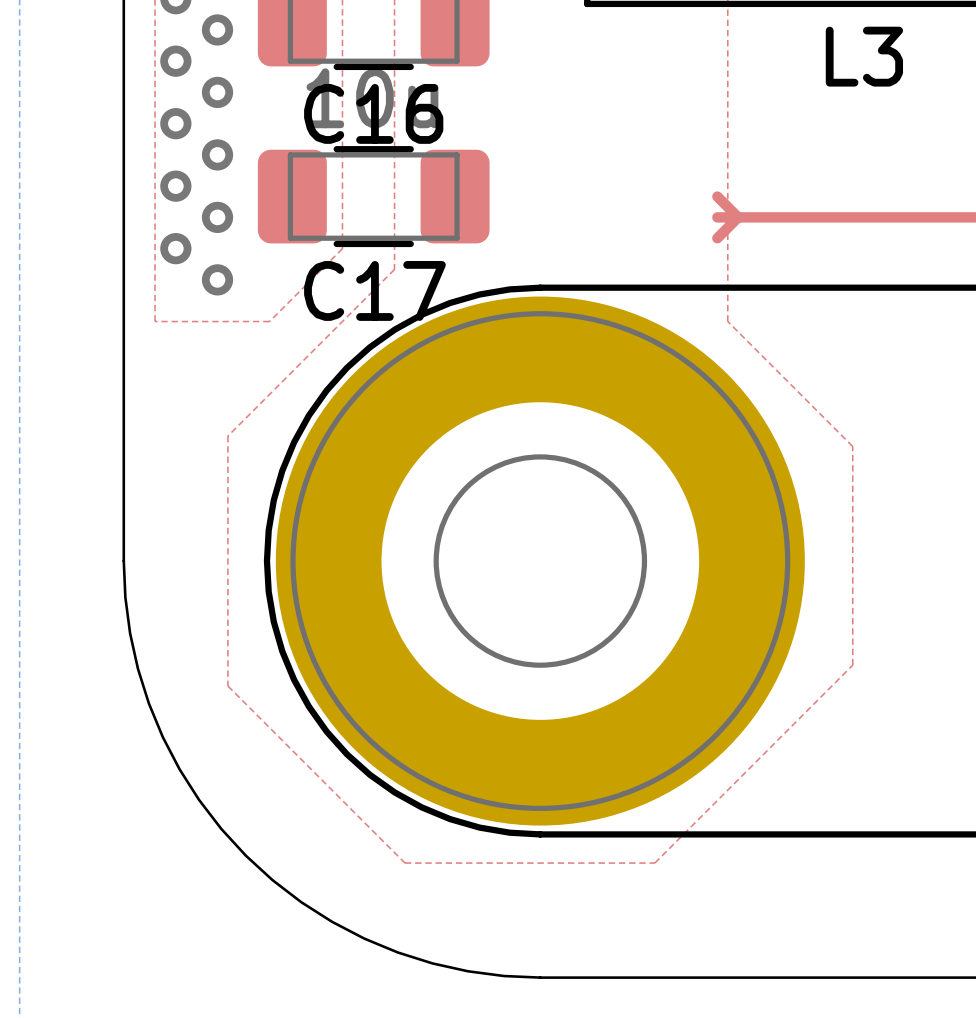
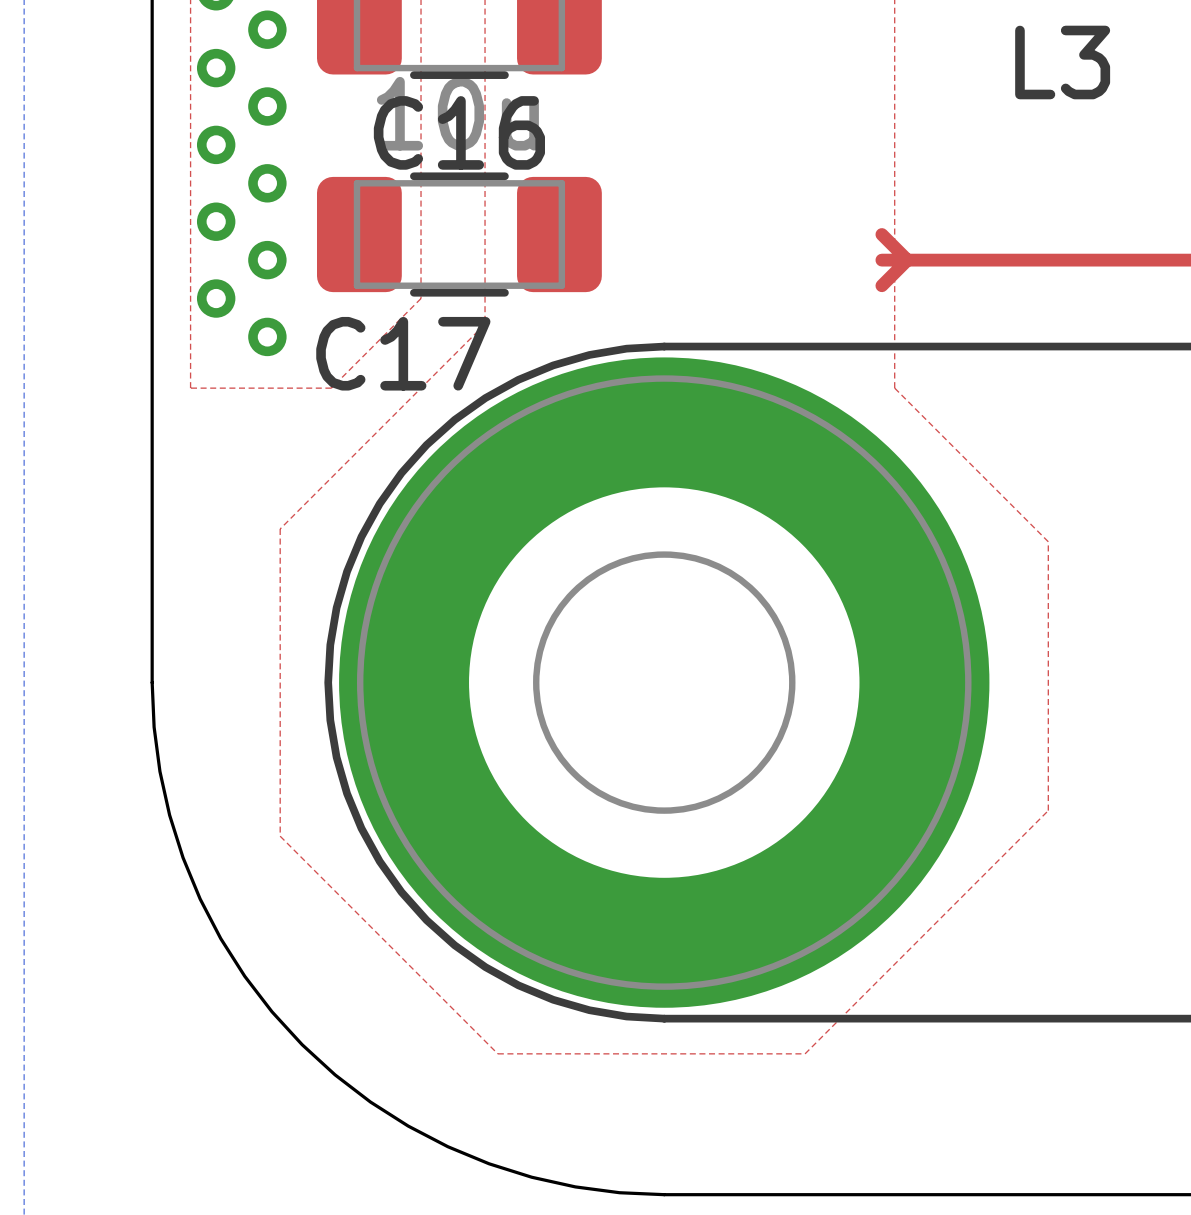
C17 name position: C17 (374, 290) -> C17 (403, 353)

